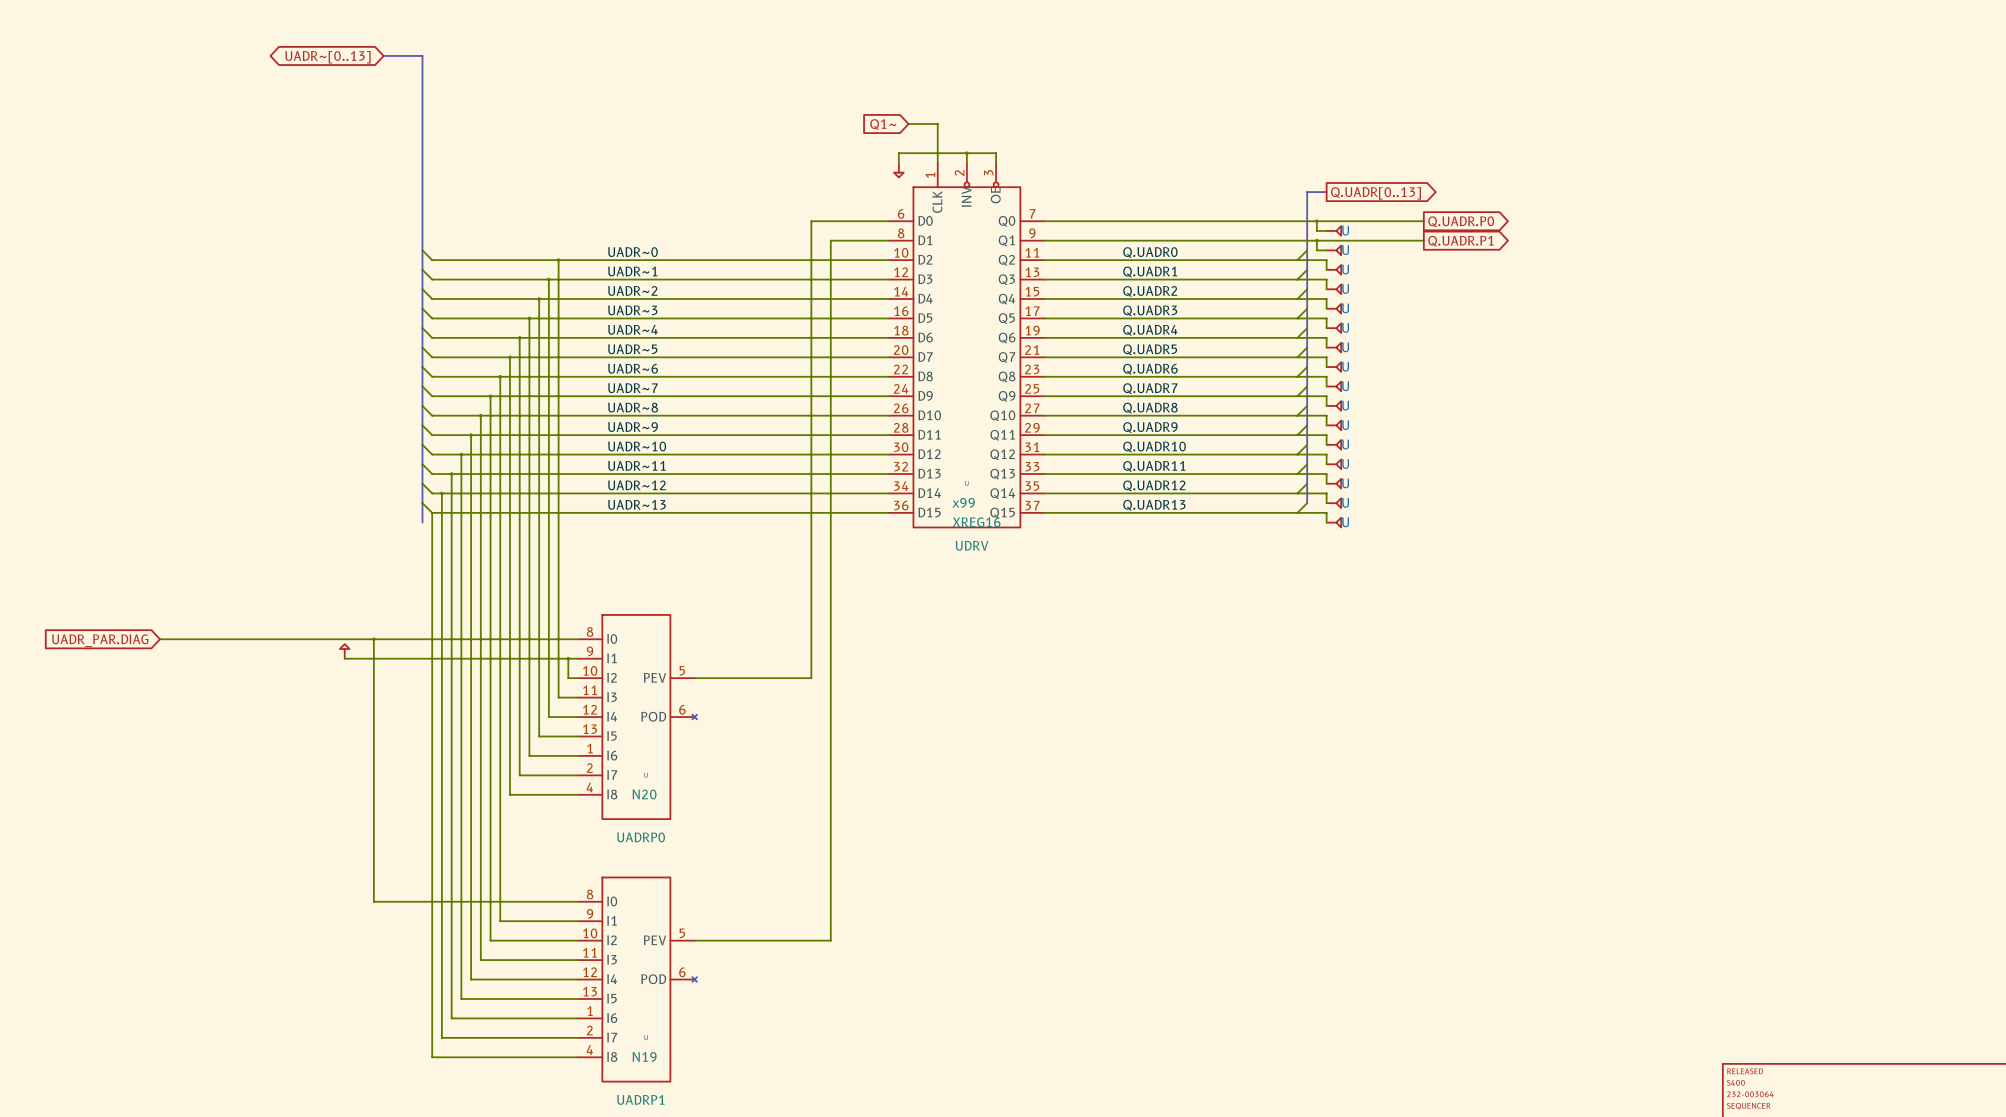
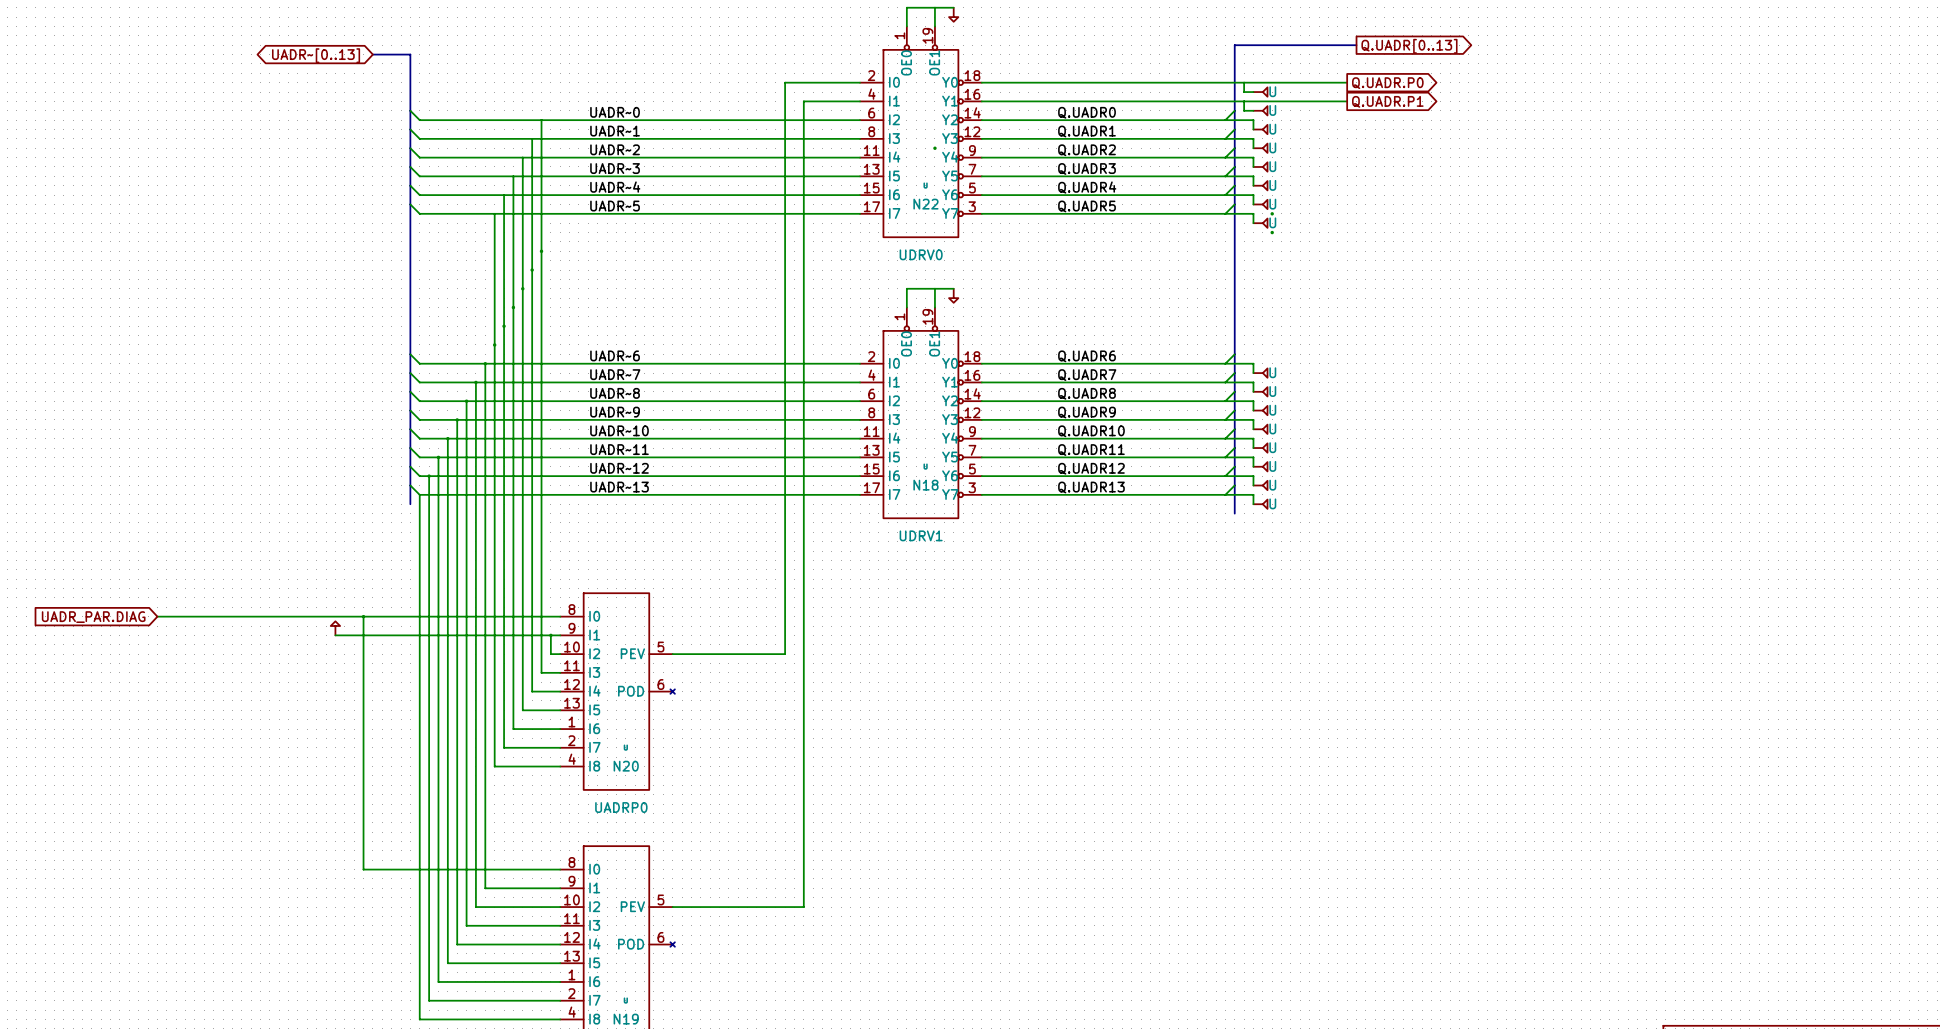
wire: none -> (934, 7) (934, 26)
wire: none -> (953, 7) (906, 7) (906, 26)
power symbol: none -> (953, 14)
bus: none -> (1356, 45) (1234, 45) (1234, 513)
global label: none -> Q.UADR[0..13] (1409, 46)
wire: none -> (860, 82) (785, 82) (785, 213) (419, 213) (410, 204)
wire: none -> (981, 82) (1347, 82)
wire: none -> (1244, 82) (1244, 92) (1253, 92)
global label: none -> Q.UADR.P0 (1387, 83)
U: none -> (1260, 92)
wire: none -> (981, 101) (1347, 101)
wire: none -> (1244, 101) (1244, 110) (1253, 110)
global label: none -> Q.UADR.P1 (1387, 101)
wire: none -> (410, 110) (419, 120) (860, 120)
wire: none -> (1234, 110) (1225, 120)
U: none -> (1260, 110)
label: none -> UADR~0 (615, 112)
label: none -> Q.UADR0 (1087, 112)
wire: none -> (541, 120) (541, 251)
global label: Q1~ (883, 124) -> none
wire: (908, 124) (937, 124) (937, 162) -> none
wire: none -> (981, 120) (1253, 120) (1253, 129)
wire: none -> (410, 129) (419, 138) (860, 138)
wire: none -> (1234, 129) (1225, 138)
U: none -> (1260, 129)
label: none -> UADR~1 (615, 131)
label: none -> Q.UADR1 (1087, 131)
part: none -> (920, 131)
wire: none -> (532, 138) (532, 270)
wire: none -> (981, 138) (1253, 138) (1253, 148)
wire: none -> (410, 148) (419, 157) (860, 157)
wire: (966, 153) (966, 162) -> none
wire: none -> (1234, 148) (1225, 157)
U: none -> (1260, 148)
label: none -> UADR~2 (615, 149)
label: none -> Q.UADR2 (1087, 150)
wire: none -> (522, 157) (522, 288)
wire: (898, 162) (898, 153) (996, 153) (996, 162) -> none
wire: none -> (981, 157) (1253, 157) (1253, 166)
power symbol: (898, 170) -> none
U: none -> (1260, 166)
label: none -> UADR~3 (615, 168)
label: none -> Q.UADR3 (1087, 169)
wire: none -> (513, 176) (513, 307)
U: none -> (1260, 185)
bus: (1326, 192) (1307, 192) (1307, 503) -> none
label: none -> UADR~4 (615, 187)
global label: Q.UADR[0..13] (1376, 193) -> none
label: none -> Q.UADR4 (1087, 187)
wire: none -> (504, 195) (504, 326)
U: none -> (1260, 204)
label: none -> UADR~5 (615, 206)
label: none -> Q.UADR5 (1087, 206)
wire: none -> (494, 213) (494, 344)
wire: (1297, 221) (1423, 221) -> (1253, 213) (1253, 223)
wire: (1316, 221) (1316, 230) (1326, 230) -> none
global label: Q.UADR.P0 (1461, 221) -> none
U: none -> (1260, 223)
U: (1334, 230) -> none
wire: (830, 240) (889, 240) -> (803, 232) (803, 101) (860, 101)
wire: (1044, 240) (1423, 240) -> none
wire: (1316, 240) (1316, 250) (1326, 250) -> none
global label: Q.UADR.P1 (1460, 241) -> none
wire: (422, 250) (432, 260) (889, 260) -> (410, 166) (419, 176) (860, 176)
wire: (1307, 250) (1297, 260) -> (1234, 166) (1225, 176)
U: (1334, 250) -> none
label: UADR~0 (632, 252) -> none
label: Q.UADR0 (1150, 252) -> none
wire: (1044, 260) (1326, 260) (1326, 269) -> (981, 176) (1253, 176) (1253, 185)
wire: (422, 269) (432, 279) (889, 279) -> (410, 185) (419, 195) (860, 195)
wire: (1307, 269) (1297, 279) -> (1234, 185) (1225, 195)
U: (1334, 269) -> none
label: UADR~1 (632, 271) -> none
label: Q.UADR1 (1150, 271) -> none
wire: (1044, 279) (1326, 279) (1326, 289) -> (981, 195) (1253, 195) (1253, 204)
wire: (422, 289) (432, 299) (889, 299) -> none
wire: (1307, 289) (1297, 299) -> (1234, 204) (1225, 213)
U: (1334, 289) -> none
label: UADR~2 (632, 290) -> none
label: Q.UADR2 (1150, 291) -> none
wire: none -> (934, 288) (934, 307)
wire: none -> (953, 288) (906, 288) (906, 307)
wire: (1044, 299) (1326, 299) (1326, 308) -> none
power symbol: none -> (953, 295)
wire: (422, 308) (432, 318) (889, 318) -> none
wire: (1307, 308) (1297, 318) -> (1234, 373) (1225, 382)
U: (1334, 308) -> none
label: UADR~3 (632, 310) -> none
label: Q.UADR3 (1150, 310) -> none
wire: (1044, 318) (1326, 318) (1326, 328) -> none
wire: (422, 328) (432, 337) (889, 337) -> none
wire: (1307, 328) (1297, 337) -> (1234, 391) (1225, 401)
U: (1334, 328) -> none
label: UADR~4 (632, 329) -> none
label: Q.UADR4 (1150, 330) -> none
wire: (1044, 337) (1326, 337) (1326, 347) -> none
part: XREG16 (966, 345) -> none
wire: (422, 347) (432, 357) (889, 357) -> none
wire: (1307, 347) (1297, 357) -> (1234, 410) (1225, 419)
U: (1334, 347) -> none
label: UADR~5 (632, 349) -> none
label: Q.UADR5 (1150, 349) -> none
wire: (1044, 357) (1326, 357) (1326, 367) -> none
wire: none -> (1234, 354) (1225, 363)
wire: (1307, 367) (1297, 376) (1326, 376) (1326, 386) -> none
U: (1334, 367) -> none
label position: Q.UADR6 (1150, 369) -> Q.UADR6 (1087, 356)
wire: none -> (1253, 363) (1253, 373)
U: none -> (1260, 373)
wire: (1307, 386) (1297, 396) (1326, 396) (1326, 405) -> none
U: (1334, 386) -> none
label position: Q.UADR7 (1150, 388) -> Q.UADR7 (1087, 375)
wire: none -> (1253, 382) (1253, 391)
U: none -> (1260, 391)
wire: (1307, 405) (1297, 415) (1326, 415) (1326, 425) -> none
U: (1334, 405) -> none
label position: Q.UADR8 (1150, 408) -> Q.UADR8 (1087, 393)
wire: none -> (1253, 401) (1253, 410)
U: none -> (1260, 410)
wire: (1307, 425) (1297, 435) (1326, 435) (1326, 444) -> none
U: (1334, 425) -> none
part: none -> (920, 412)
label position: Q.UADR9 (1150, 427) -> Q.UADR9 (1087, 412)
wire: none -> (1253, 419) (1253, 429)
wire: none -> (1234, 429) (1225, 438)
U: none -> (1260, 429)
wire: (1307, 444) (1297, 454) (1326, 454) (1326, 464) -> none
U: (1334, 444) -> none
label position: Q.UADR10 (1154, 446) -> Q.UADR10 (1091, 431)
wire: none -> (1253, 438) (1253, 448)
wire: none -> (1234, 448) (1225, 457)
U: none -> (1260, 448)
wire: (1307, 464) (1297, 474) (1326, 474) (1326, 483) -> none
U: (1334, 464) -> none
label position: Q.UADR11 (1154, 466) -> Q.UADR11 (1091, 450)
wire: none -> (1253, 457) (1253, 466)
wire: none -> (1234, 466) (1225, 476)
U: none -> (1260, 466)
wire: (1307, 483) (1297, 493) (1326, 493) (1326, 503) -> none
U: (1334, 483) -> none
label position: Q.UADR12 (1154, 485) -> Q.UADR12 (1091, 468)
wire: none -> (1253, 476) (1253, 485)
wire: none -> (1234, 485) (1225, 494)
U: none -> (1260, 485)
wire: (1307, 503) (1297, 512) (1326, 512) (1326, 522) -> none
U: (1334, 503) -> none
label position: Q.UADR13 (1154, 505) -> Q.UADR13 (1091, 487)
wire: none -> (1253, 494) (1253, 504)
U: none -> (1260, 504)
U: (1334, 522) -> none

